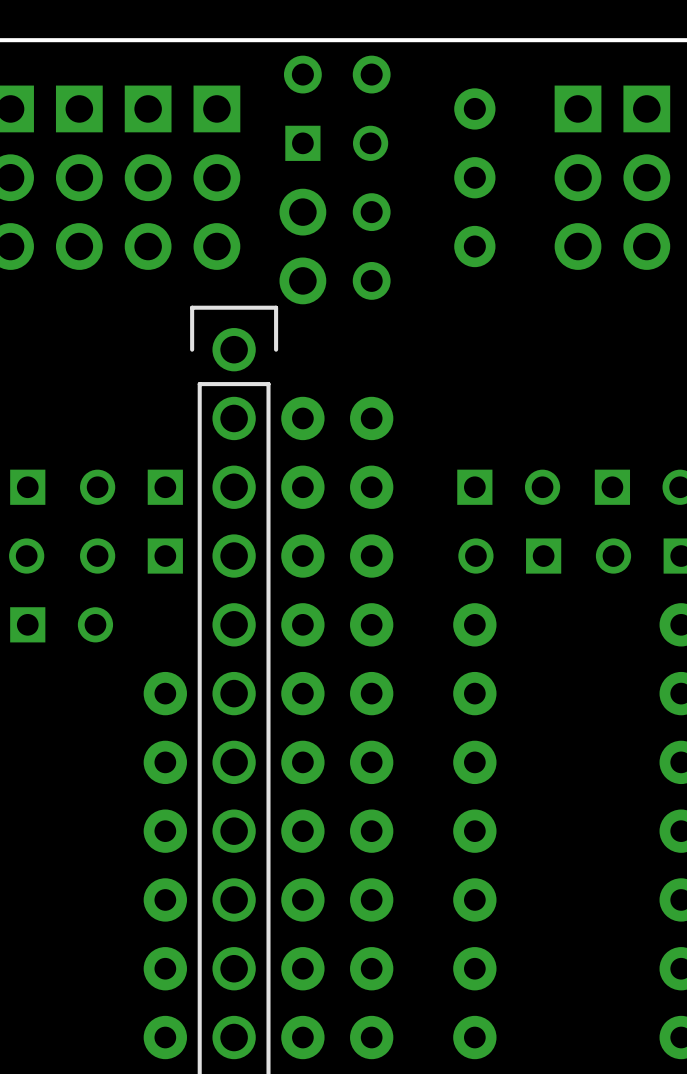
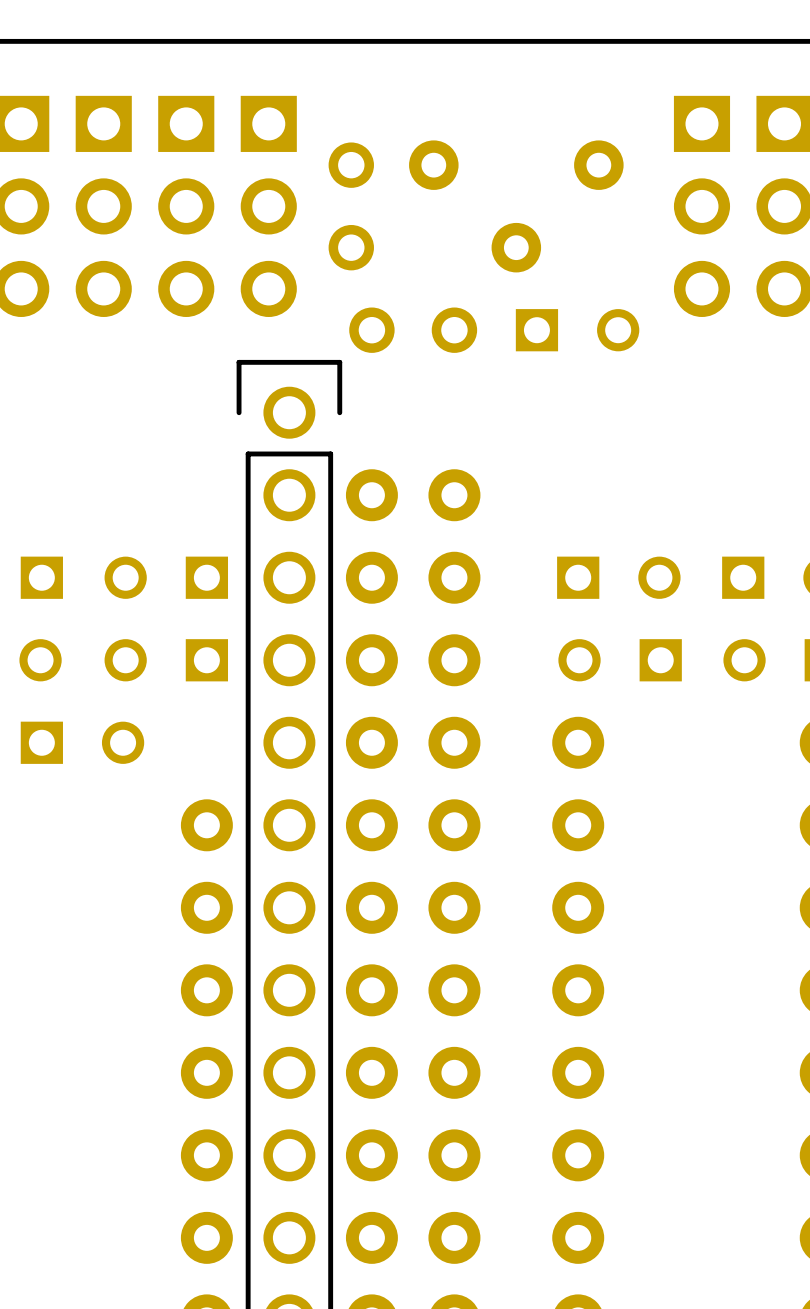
part: (337, 74) -> none
part position: (336, 143) -> (577, 330)
part: none -> (351, 206)
part: none -> (516, 206)
part: (474, 177) -> none
part: (302, 246) -> none
part rotation: 0° (371, 246) -> 90° clockwise (413, 330)

